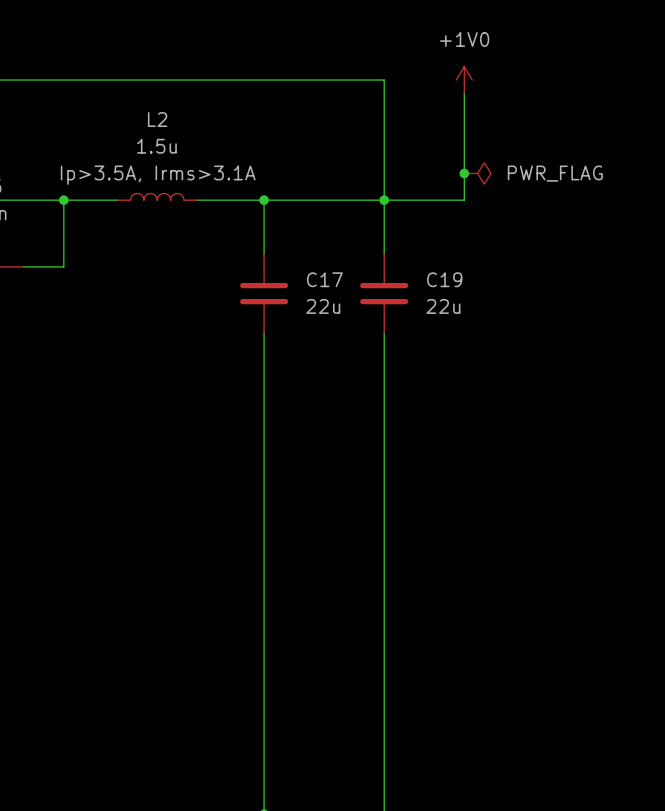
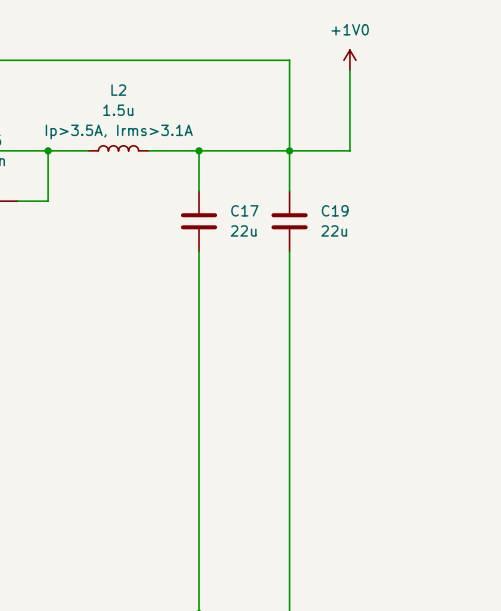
junction: (464, 173) -> none
power symbol: PWR_FLAG (477, 173) -> none

